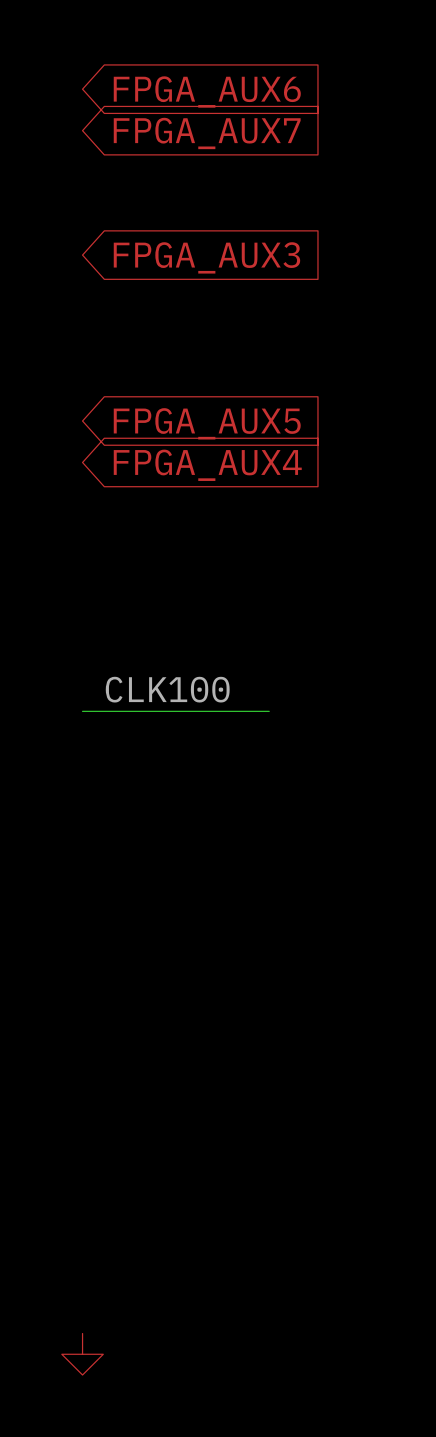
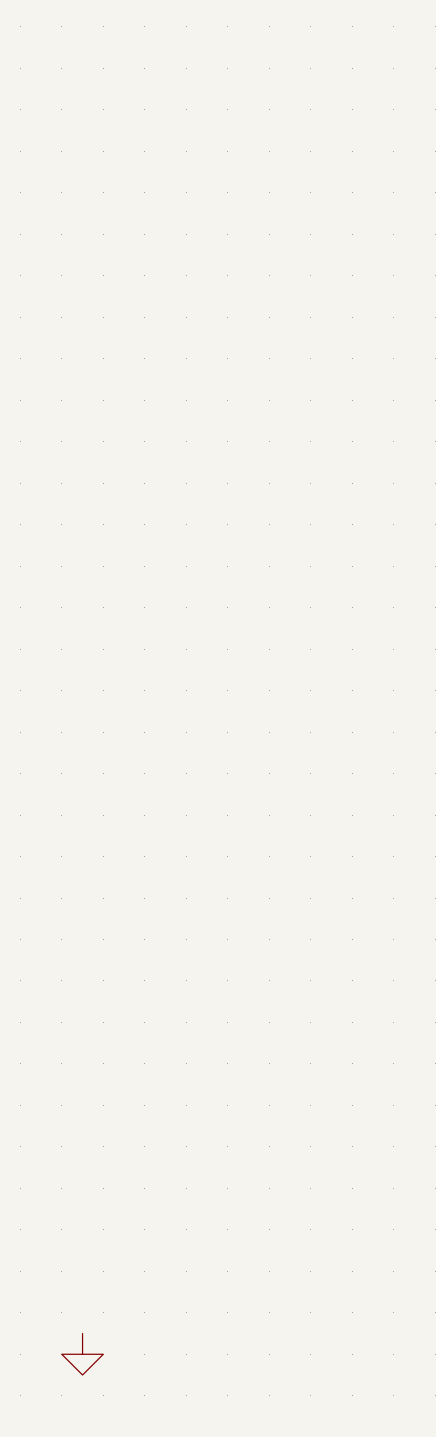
global label: FPGA_AUX6 (207, 91) -> none
global label: FPGA_AUX7 (207, 133) -> none
global label: FPGA_AUX3 (206, 257) -> none
global label: FPGA_AUX5 (207, 423) -> none
global label: FPGA_AUX4 (207, 465) -> none
label: CLK100 (167, 689) -> none
wire: (82, 711) (269, 711) -> none

